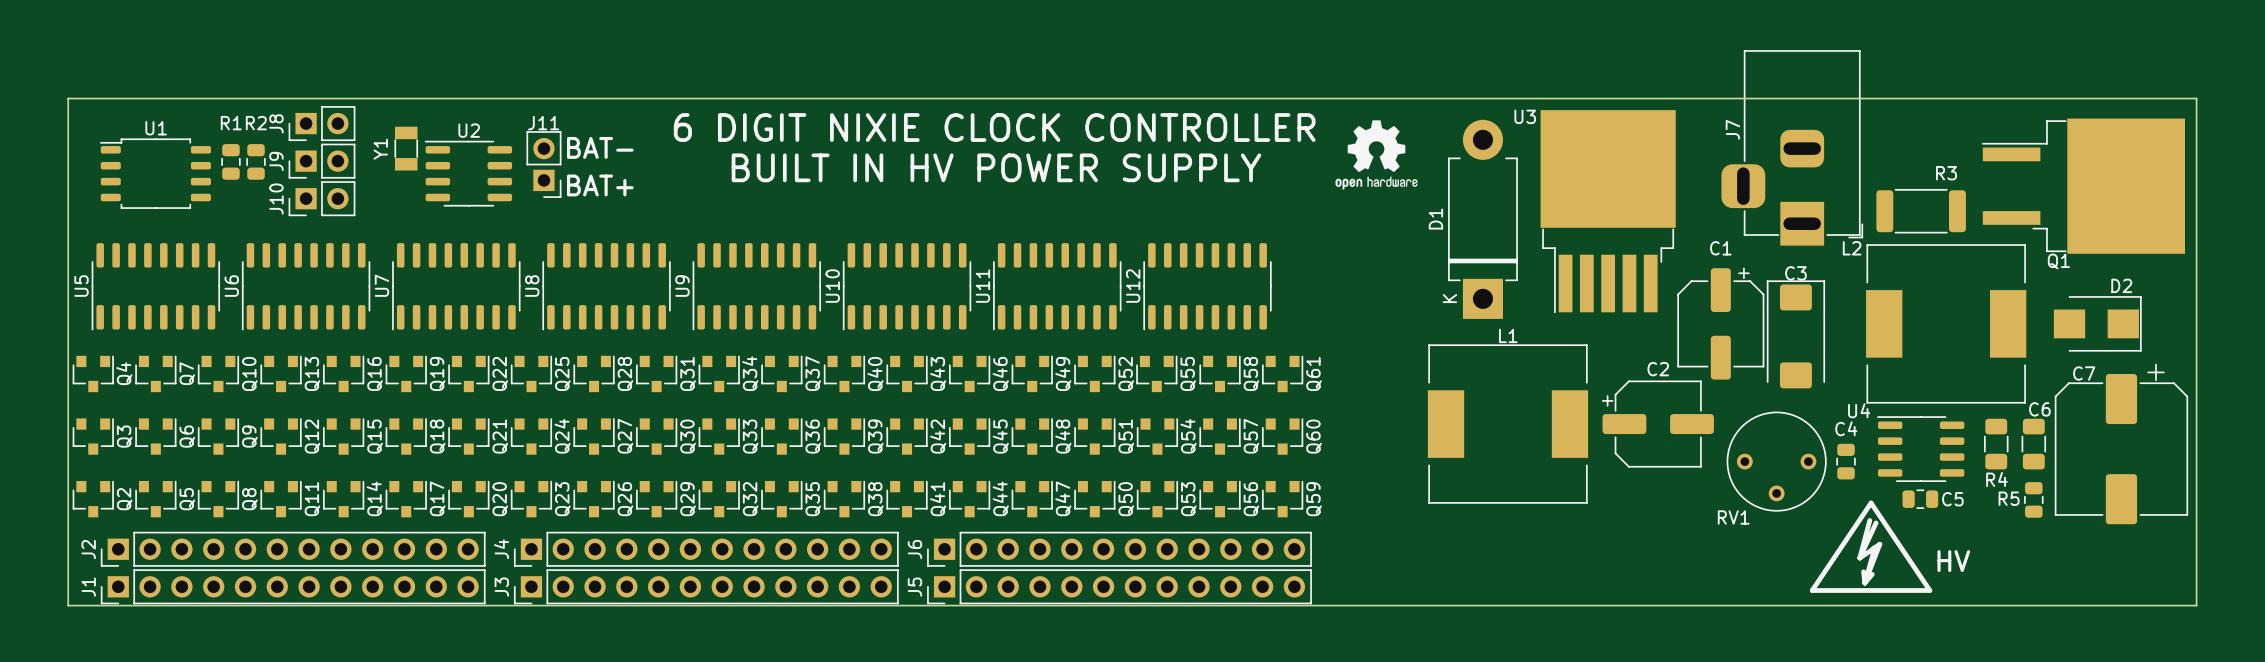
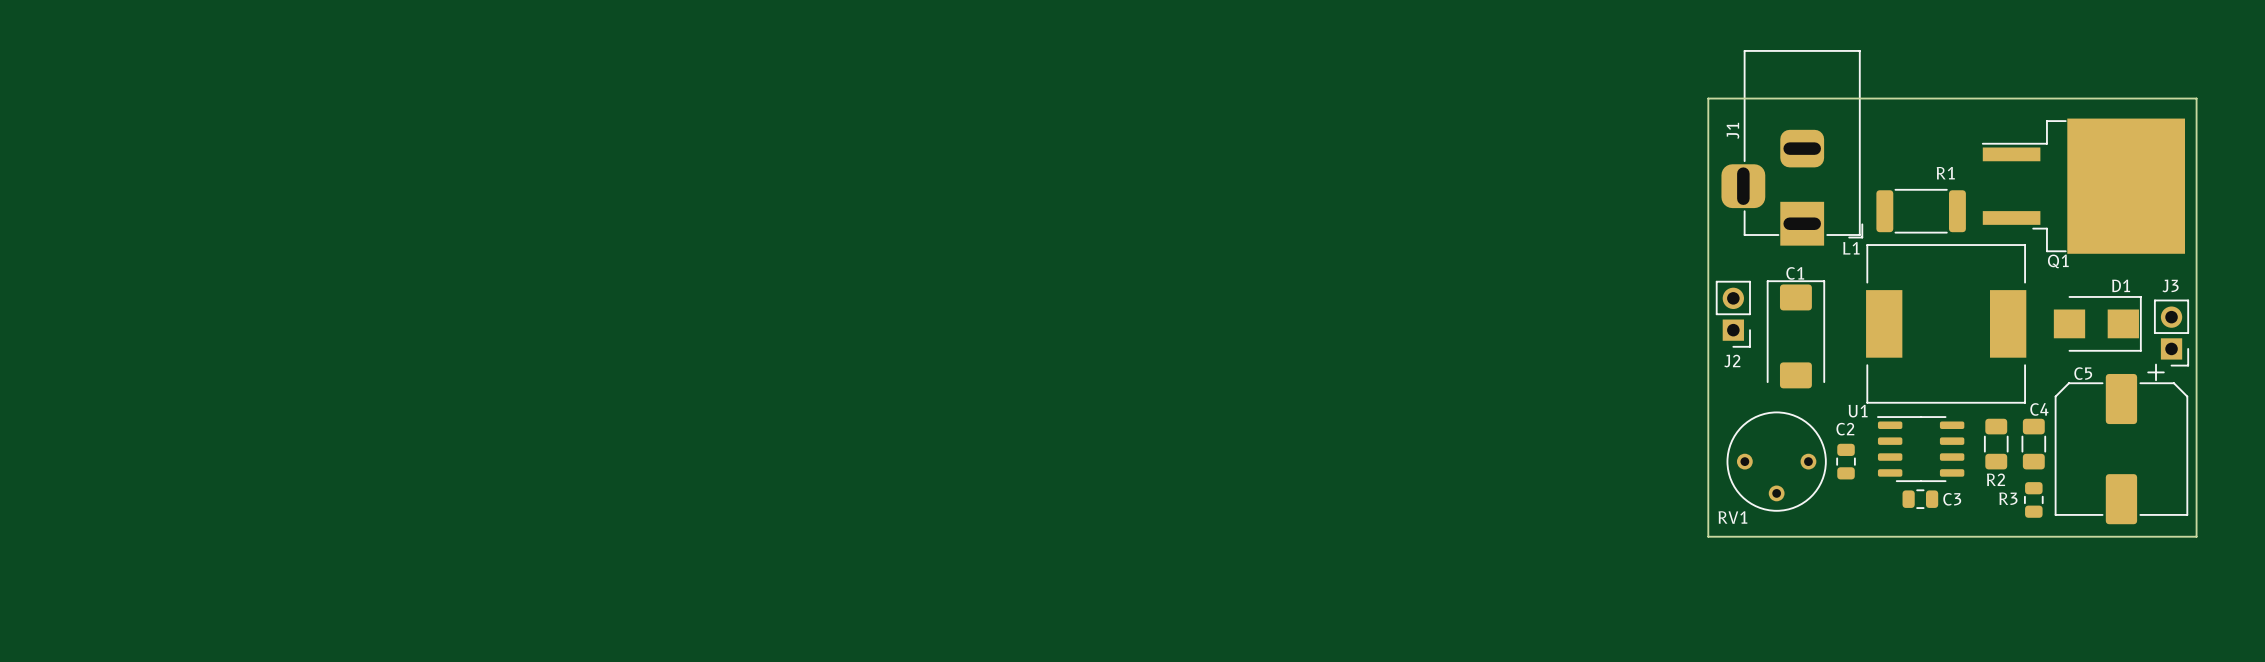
board edge: (1708, 98) (68, 98) (68, 605) (2196, 605) (2196, 536) -> (1708, 98) (1708, 536) (2196, 536)
drawing: [1335, 120, 1418, 190] -> none
J8: (321, 123) -> none
text: 6 DIGIT NIXIE CLOCK CONTROLLER (994, 127) -> none
J7 name: J7 (1732, 129) -> J1 (1732, 130)
text: BAT- (600, 147) -> none
Y1: (406, 148) -> none
R1: (230, 161) -> none
R2: (256, 161) -> none
J9: (321, 161) -> none
J11: (543, 164) -> none
text: BUILT IN HV POWER SUPPLY (996, 167) -> none
U1: (155, 173) -> none
U2: (468, 173) -> none
R3 name: R3 (1946, 173) -> R1 (1945, 173)
text: BAT+ (600, 185) -> none
J10: (321, 198) -> none
U3: (1608, 211) -> none
D1: (1482, 219) -> none
L2 name: L2 (1852, 248) -> L1 (1851, 248)
C3 name: C3 (1795, 273) -> C1 (1795, 273)
D2 name: D2 (2121, 285) -> D1 (2121, 285)
U5: (155, 286) -> none
U6: (306, 286) -> none
U7: (456, 286) -> none
U8: (606, 286) -> none
U9: (756, 286) -> none
U10: (907, 286) -> none
U11: (1057, 286) -> none
U12: (1207, 286) -> none
C1: (1720, 323) -> none
Q4: (93, 373) -> none
Q7: (155, 373) -> none
Q10: (218, 373) -> none
Q13: (281, 373) -> none
Q16: (343, 373) -> none
Q19: (406, 373) -> none
Q22: (468, 373) -> none
Q25: (531, 373) -> none
Q28: (594, 373) -> none
Q31: (656, 373) -> none
Q34: (719, 373) -> none
Q37: (781, 373) -> none
Q40: (844, 373) -> none
Q43: (907, 373) -> none
Q46: (969, 373) -> none
Q49: (1032, 373) -> none
Q52: (1094, 373) -> none
Q55: (1156, 373) -> none
Q58: (1220, 373) -> none
Q61: (1282, 373) -> none
C7 name: C7 (2084, 373) -> C5 (2083, 373)
C6 name: C6 (2039, 409) -> C4 (2039, 409)
U4 name: U4 (1859, 410) -> U1 (1858, 411)
L1: (1507, 424) -> none
C2: (1657, 424) -> none
C4 name: C4 (1846, 428) -> C2 (1845, 429)
Q3: (93, 436) -> none
Q6: (155, 436) -> none
Q9: (218, 436) -> none
Q12: (281, 436) -> none
Q15: (343, 436) -> none
Q18: (406, 436) -> none
Q21: (468, 436) -> none
Q24: (531, 436) -> none
Q27: (594, 436) -> none
Q30: (656, 436) -> none
Q33: (719, 436) -> none
Q36: (781, 436) -> none
Q39: (844, 436) -> none
Q42: (907, 436) -> none
Q45: (969, 436) -> none
Q48: (1032, 436) -> none
Q51: (1094, 436) -> none
Q54: (1157, 436) -> none
Q57: (1220, 436) -> none
Q60: (1282, 436) -> none
R4 name: R4 (1996, 479) -> R2 (1996, 479)
R5 name: R5 (2009, 498) -> R3 (2008, 498)
Q2: (93, 499) -> none
Q5: (155, 499) -> none
Q8: (218, 499) -> none
Q11: (281, 499) -> none
Q14: (343, 499) -> none
Q17: (406, 499) -> none
Q20: (468, 499) -> none
Q23: (531, 499) -> none
Q26: (594, 499) -> none
Q29: (656, 499) -> none
Q32: (719, 499) -> none
Q35: (781, 499) -> none
Q38: (844, 499) -> none
Q41: (907, 499) -> none
Q44: (969, 499) -> none
Q47: (1032, 499) -> none
Q50: (1094, 499) -> none
Q53: (1157, 499) -> none
Q56: (1220, 499) -> none
Q59: (1282, 499) -> none
C5 name: C5 (1952, 499) -> C3 (1952, 499)
drawing: [1809, 500, 1933, 593] -> none
J2 footprint: [100, 531, 486, 567] -> [1715, 280, 1751, 348]
J2 name position: J2 (88, 549) -> J2 (1732, 361)
J4: (706, 549) -> none
J6: (1119, 549) -> none
text: HV (1953, 561) -> none
J3 footprint: [514, 569, 899, 605] -> [2154, 299, 2189, 367]
J1: (293, 586) -> none
J5: (1119, 586) -> none
J3 name position: J3 (501, 587) -> J3 (2170, 285)

